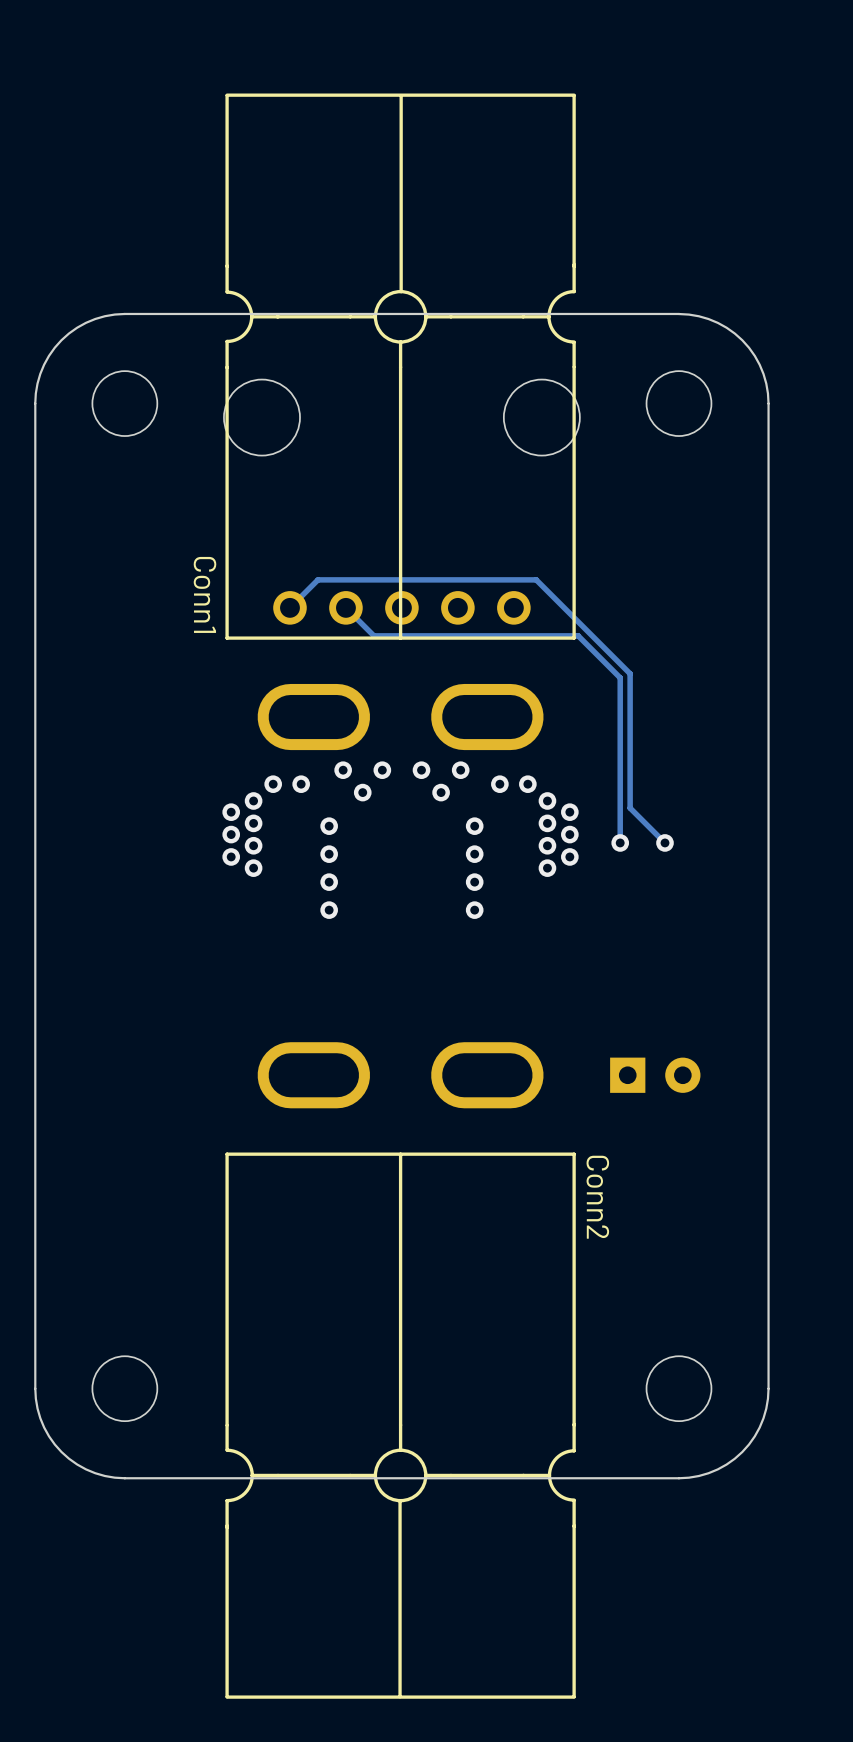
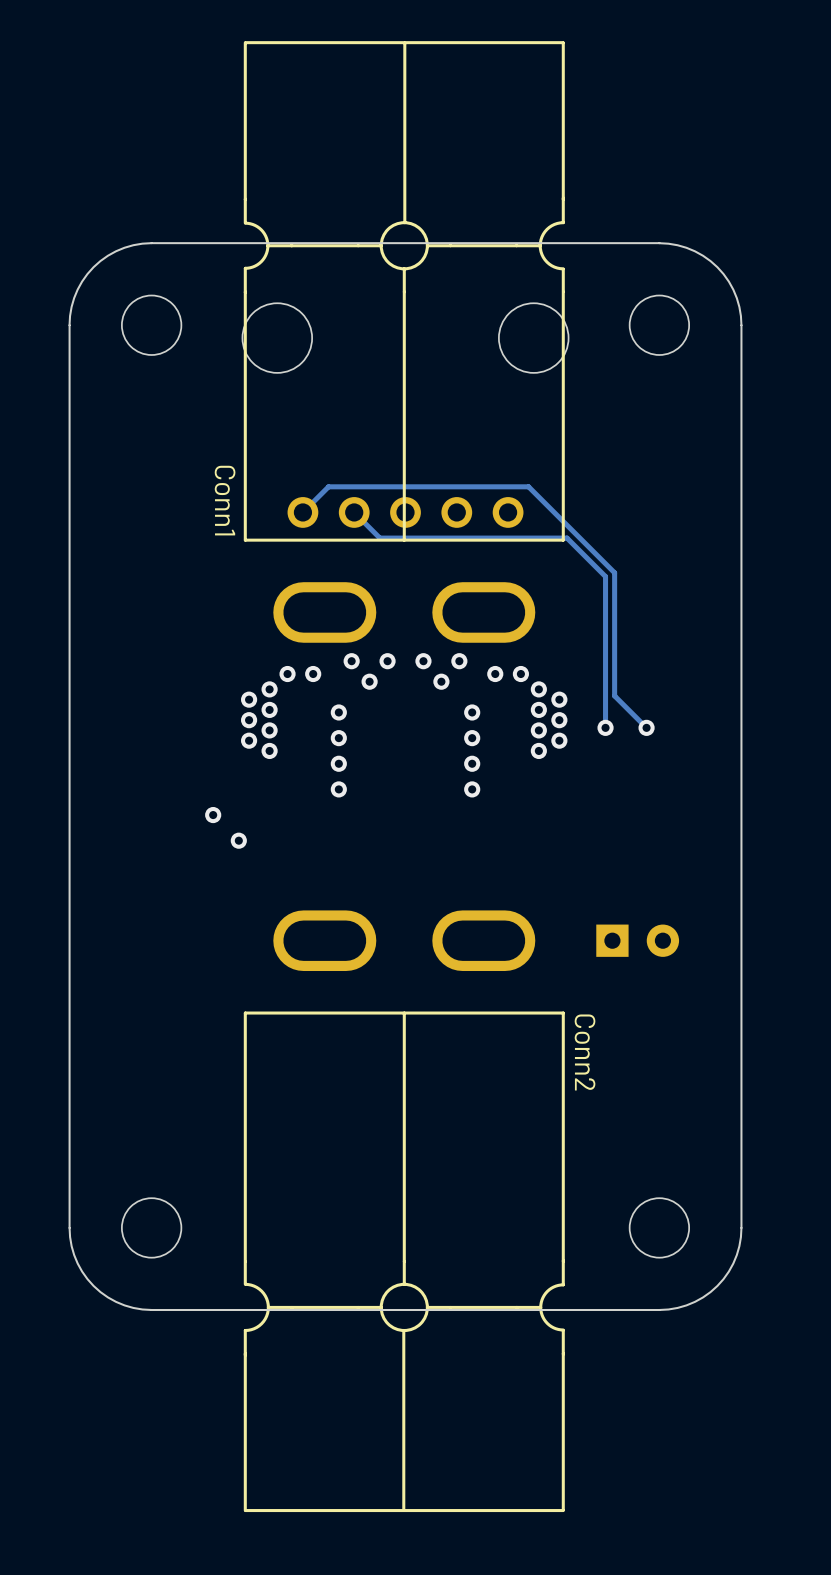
via: none -> (213, 815)
via: none -> (238, 840)

